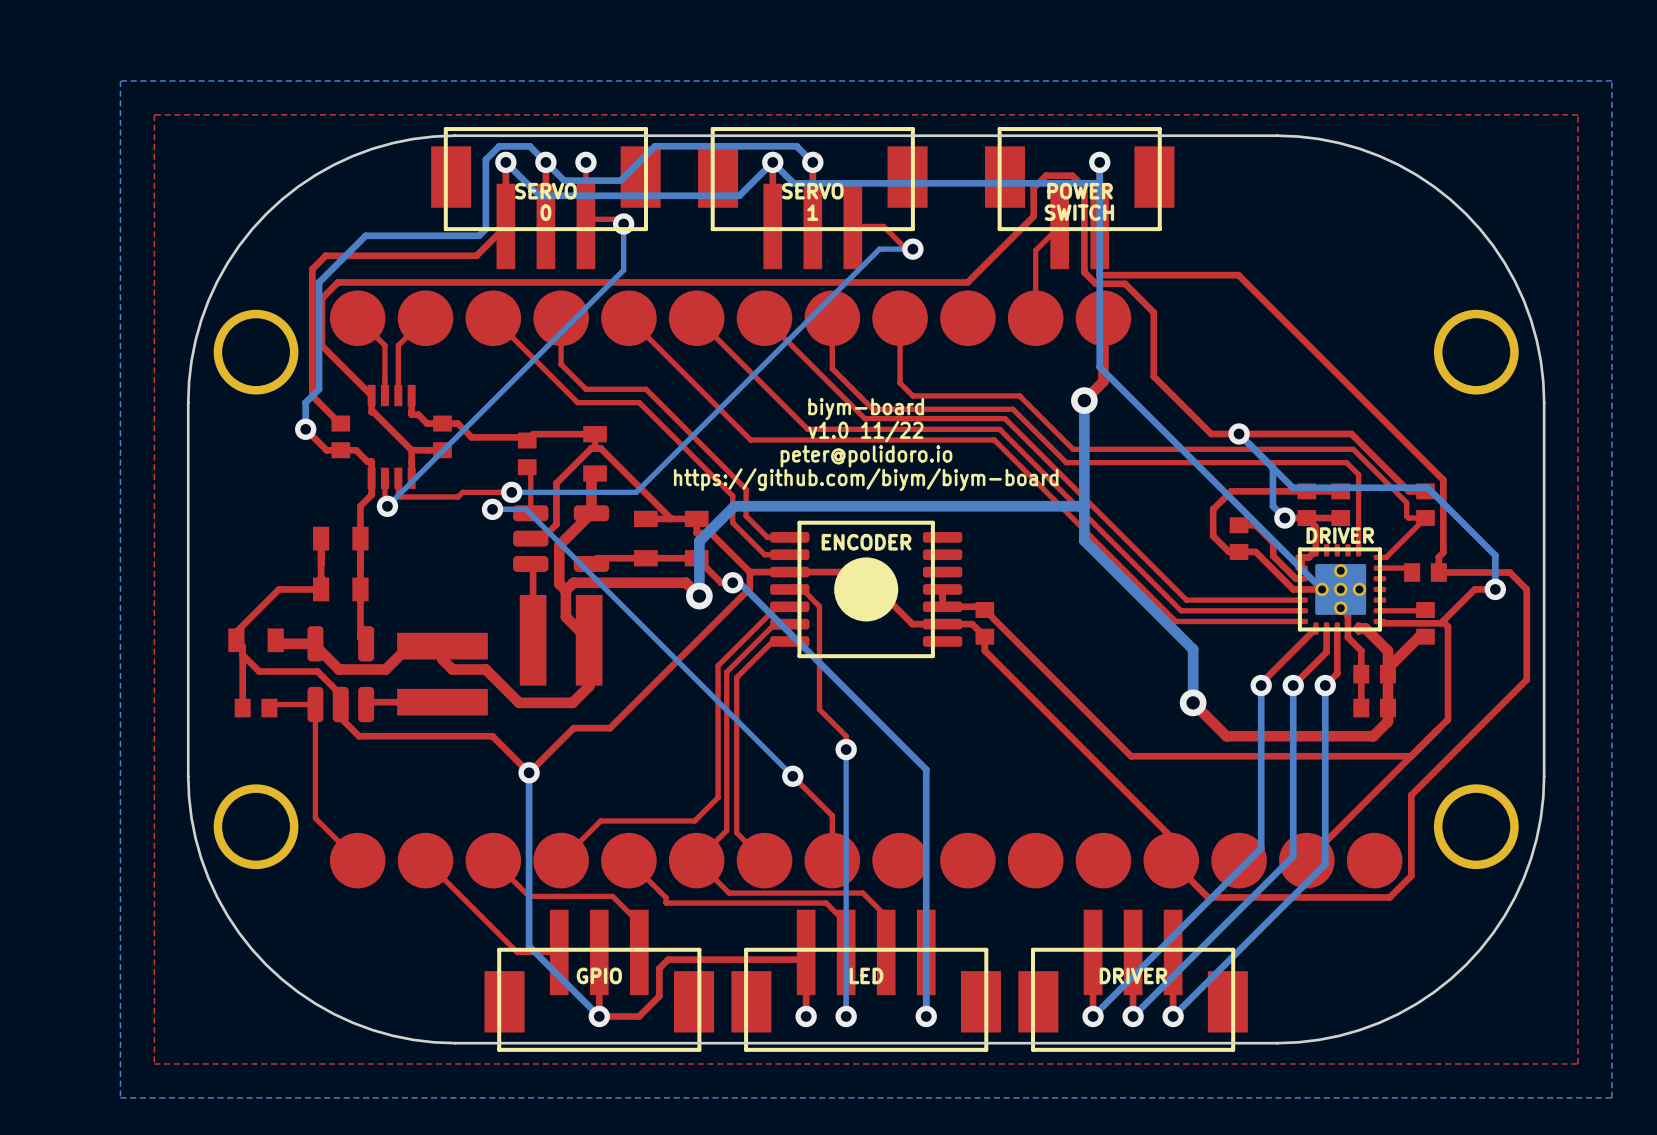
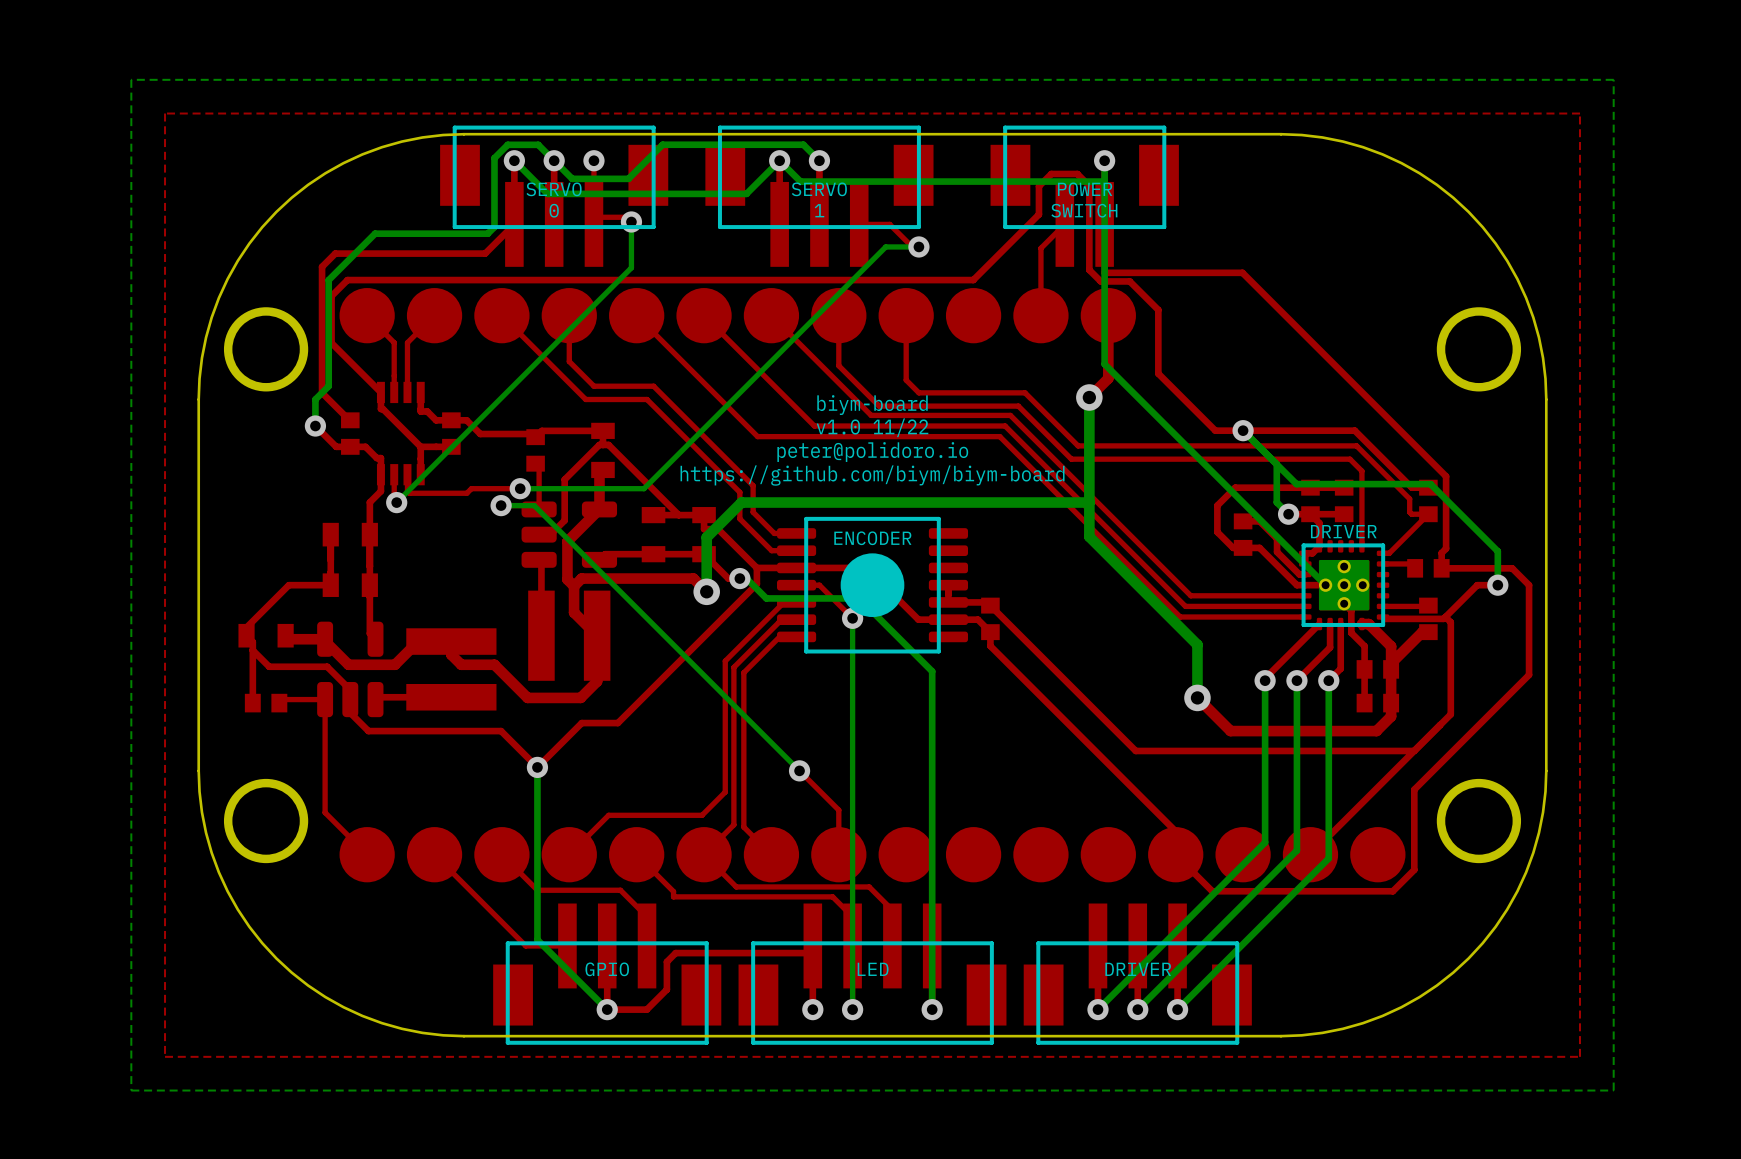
top track: (802, 589) (819, 606) (819, 709) (846, 736) (846, 749) -> (809, 585) (819, 585) (852, 618)
bottom track: (759, 602) (926, 769) -> (766, 598) (859, 598) (932, 671) (932, 764)
bottom track: none -> (852, 618) (852, 744)
via position: (846, 749) -> (852, 618)

